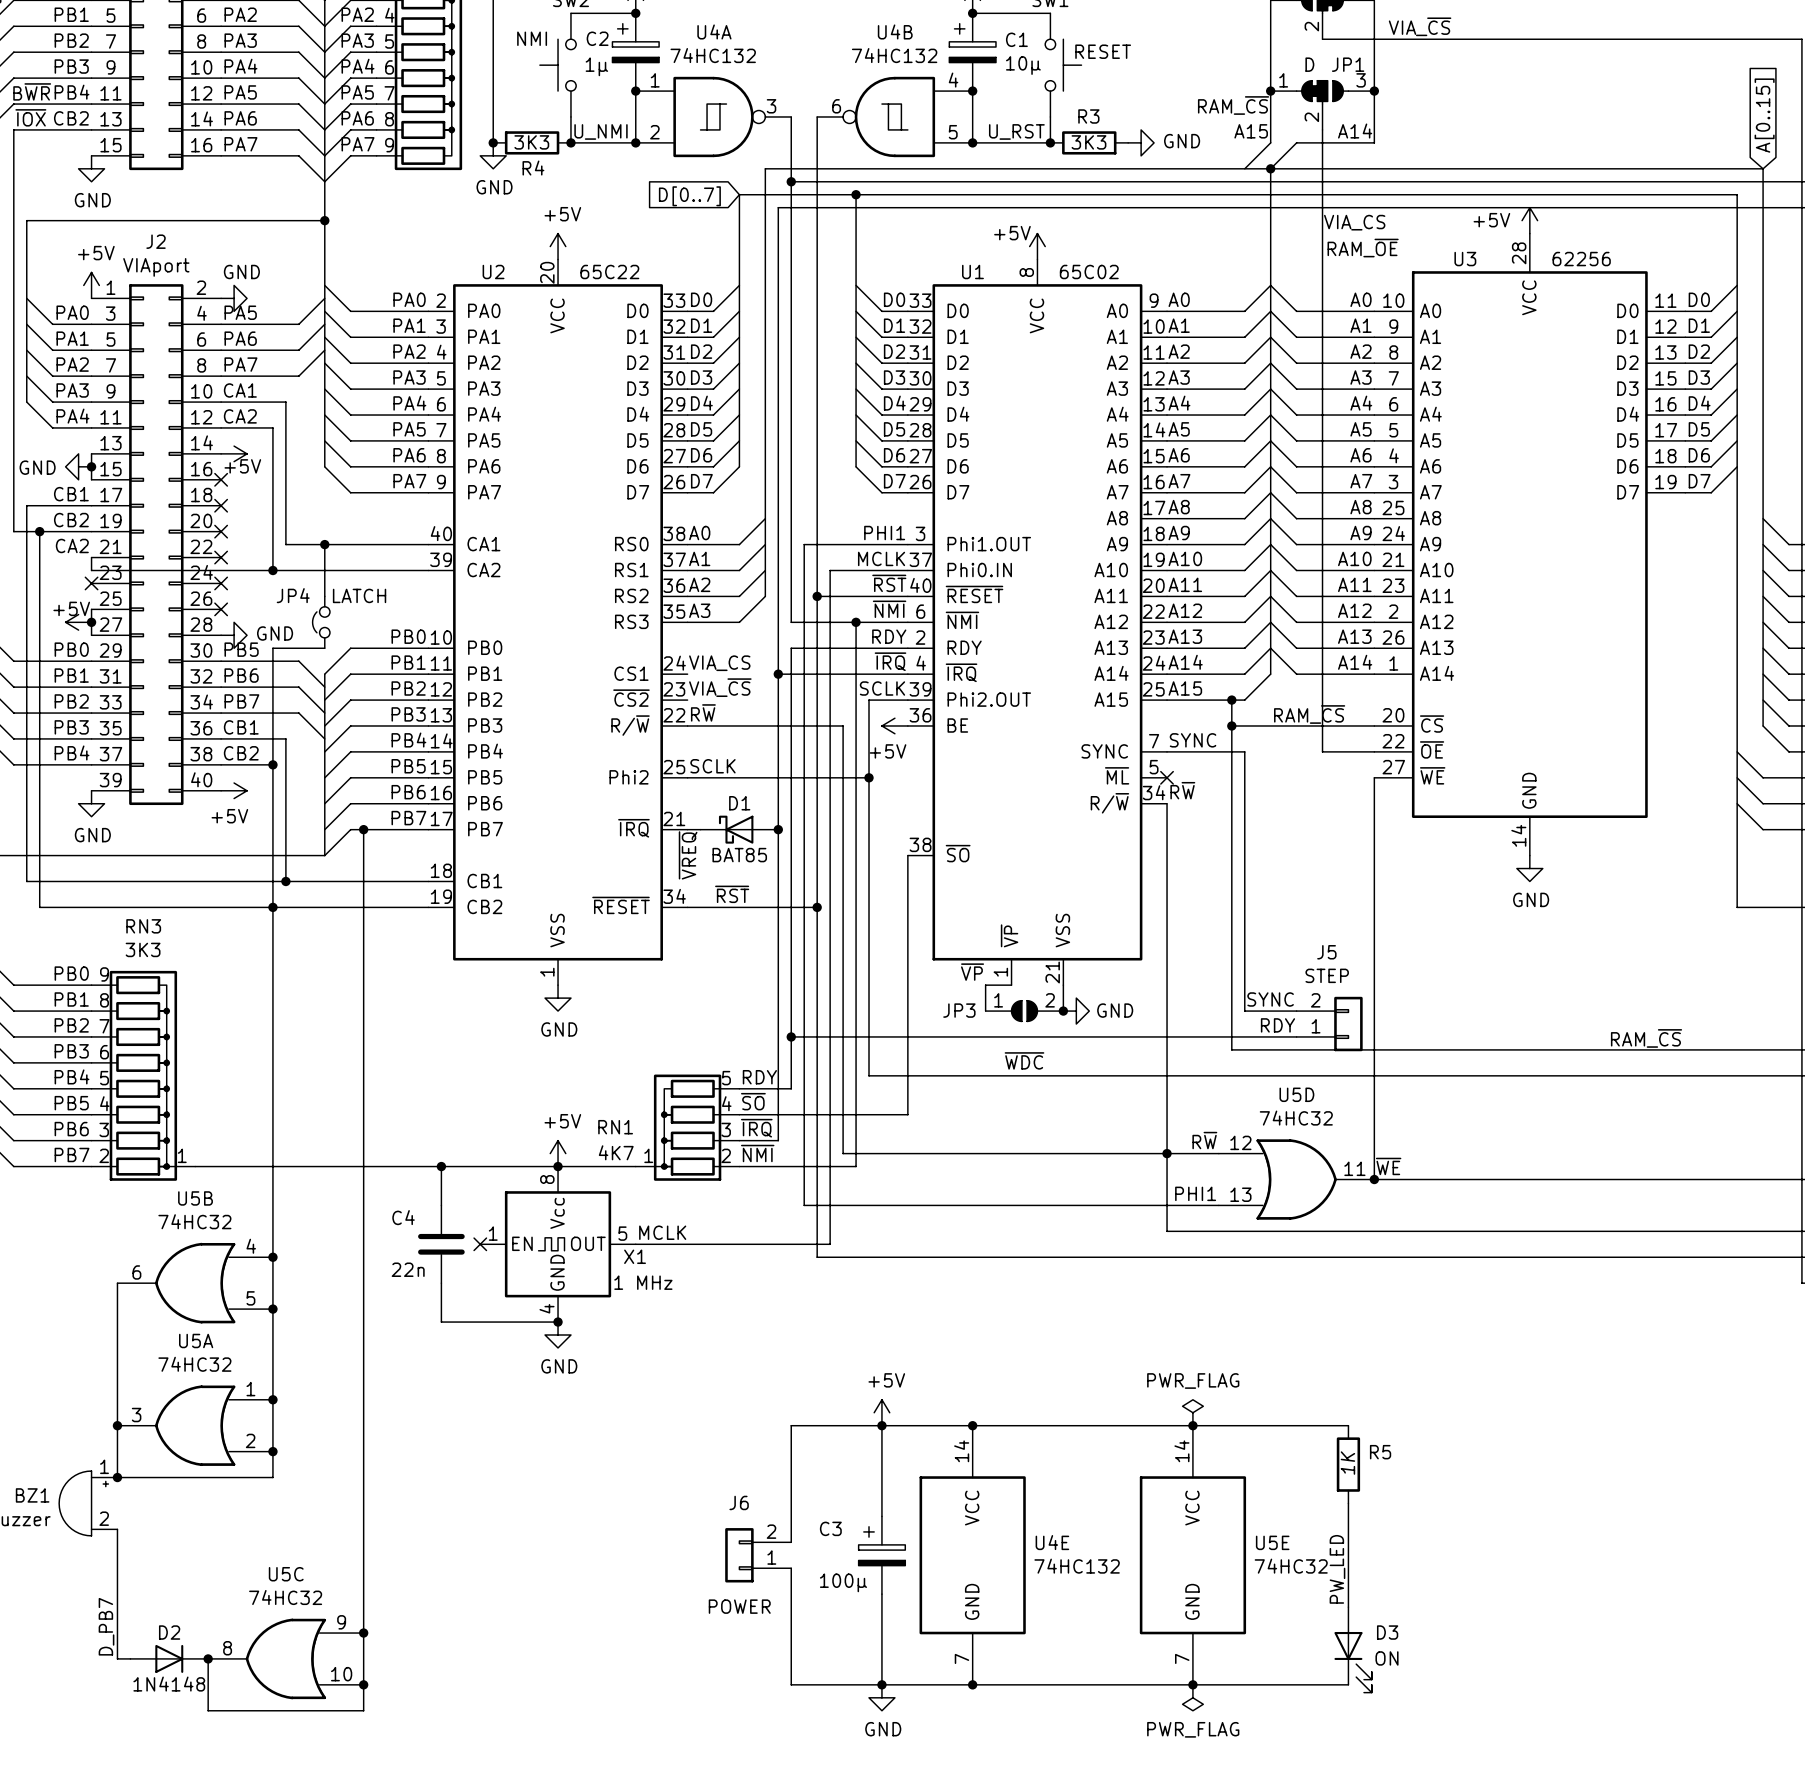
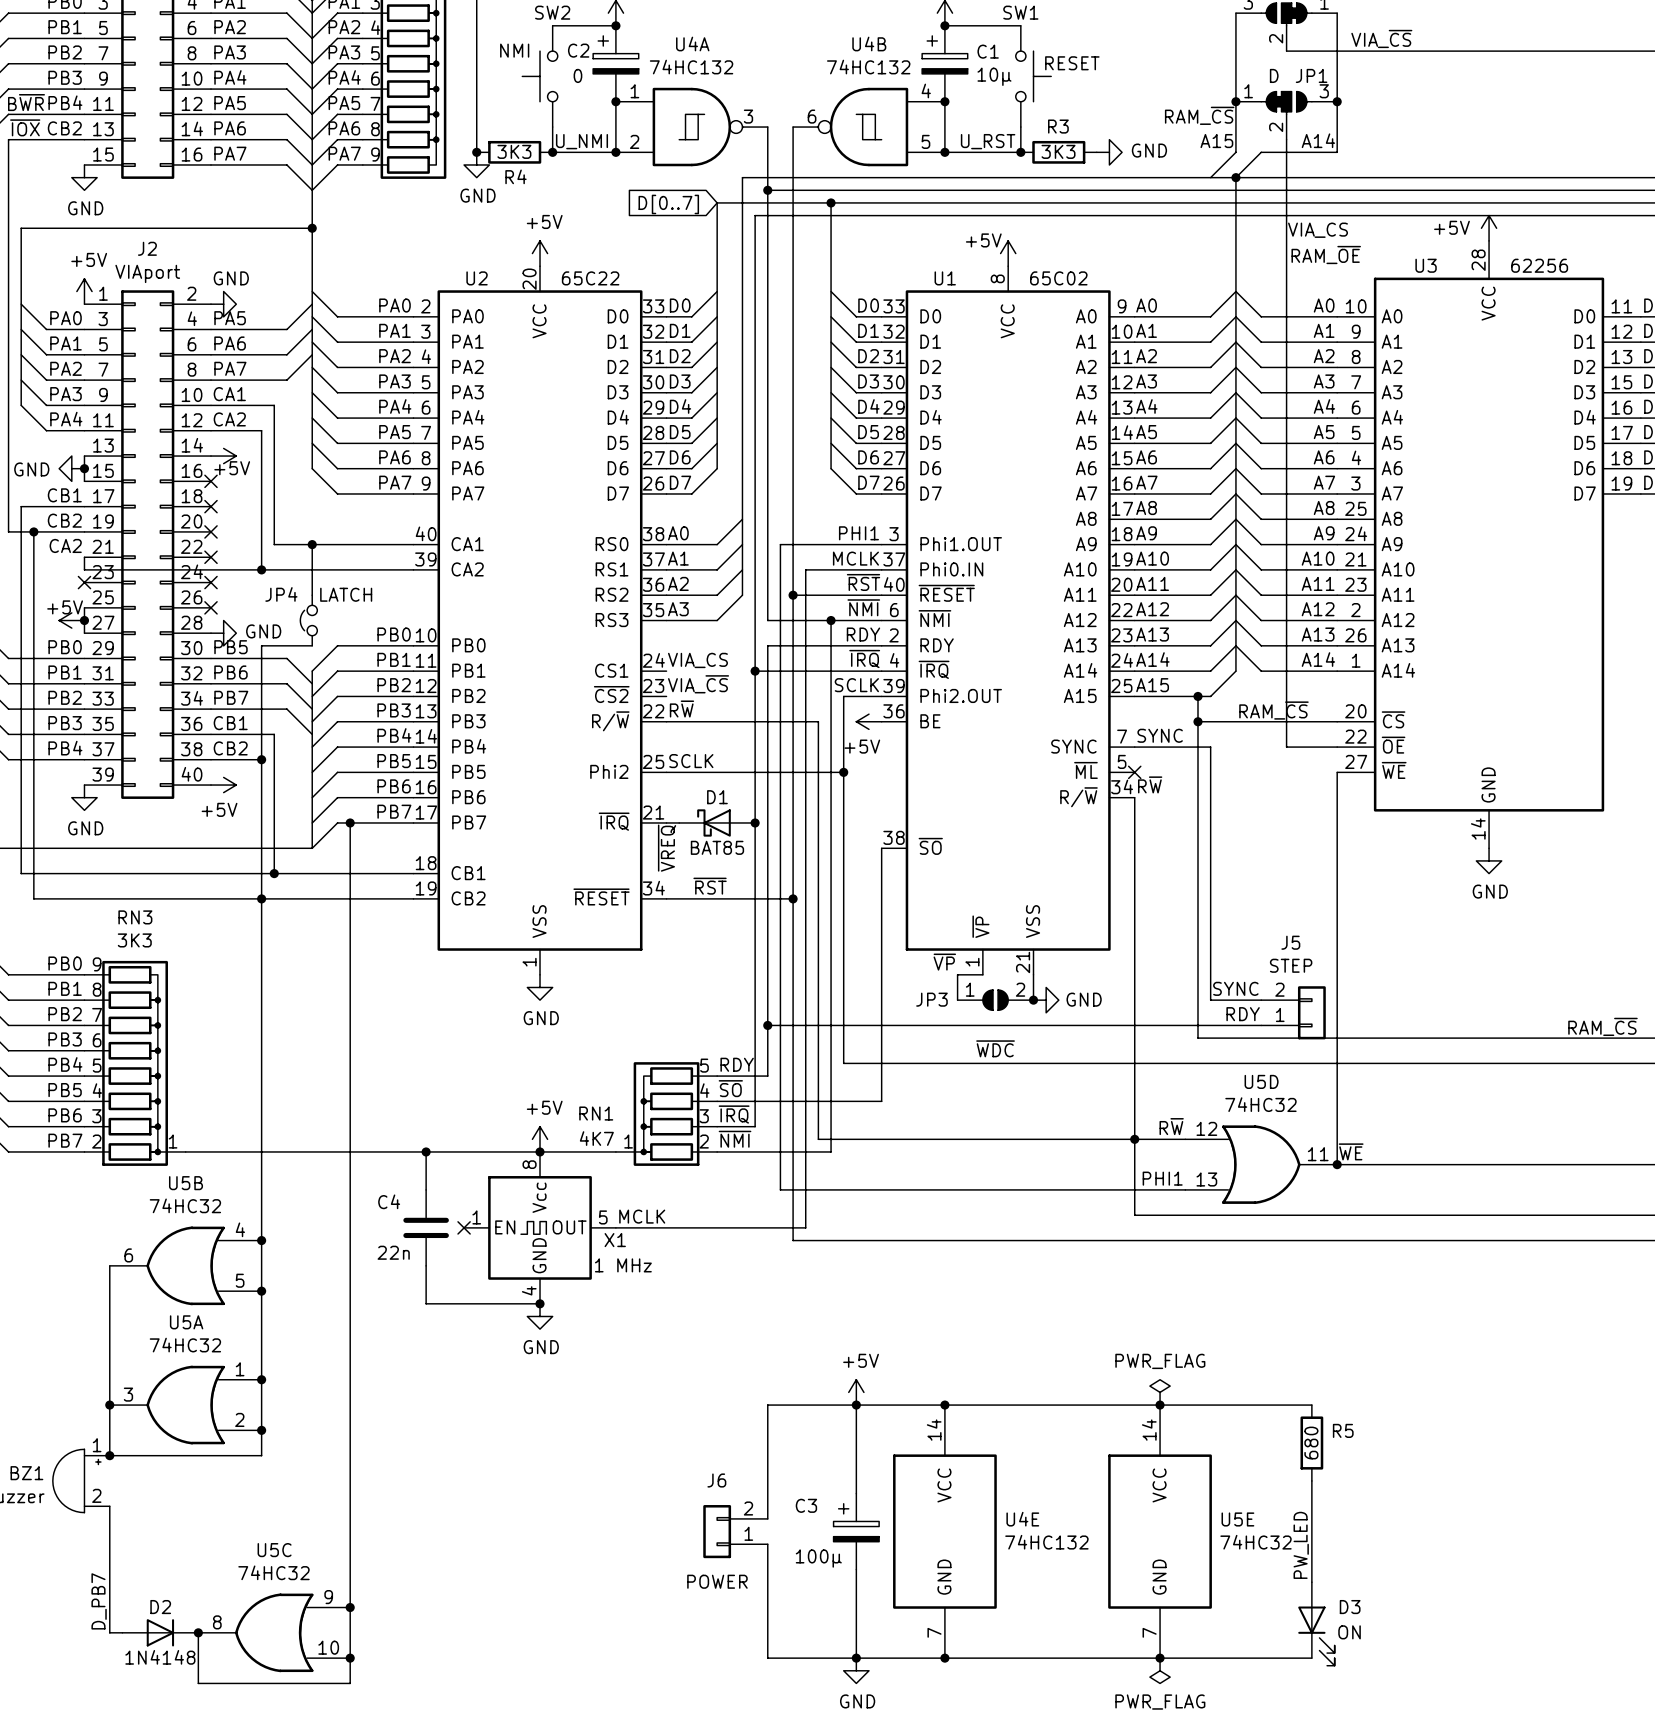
C2 value: 1µ (596, 66) -> 0 (577, 75)
R5 value: 1K (1347, 1463) -> 680 (1311, 1443)

